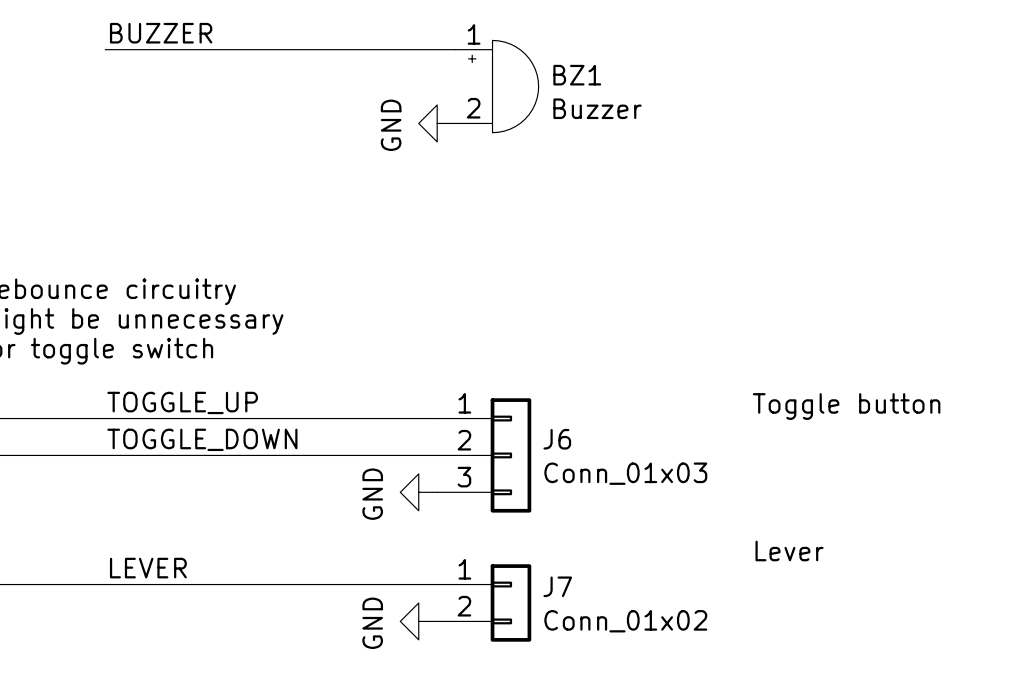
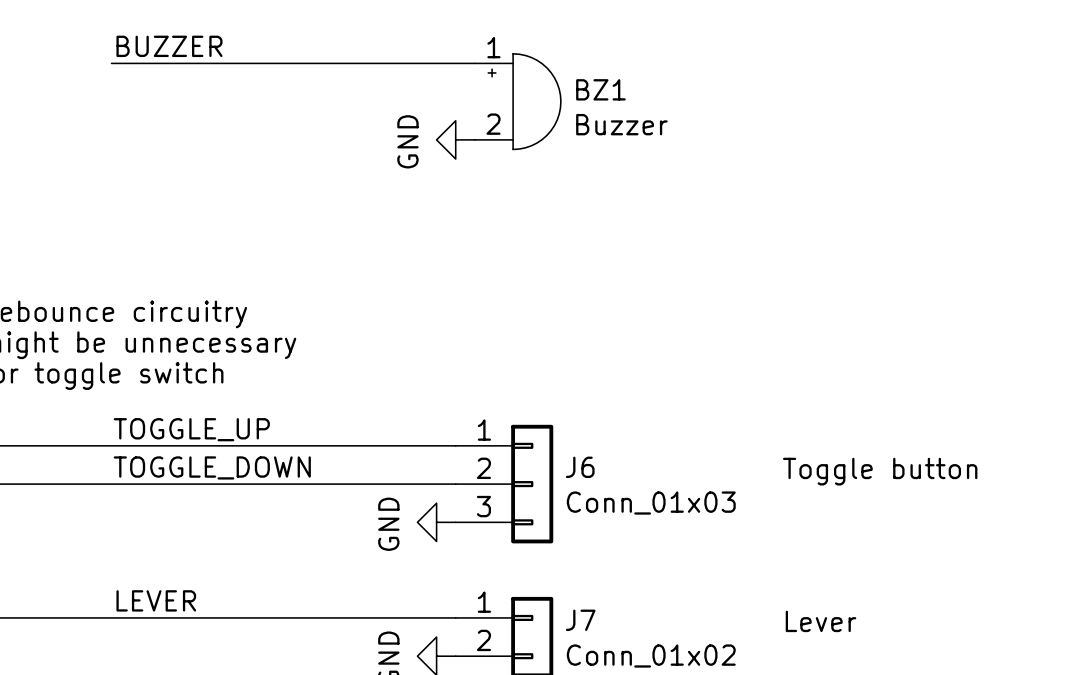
text position: Toggle button (846, 406) -> Toggle button (880, 471)
text position: Lever (789, 550) -> Lever (821, 621)

